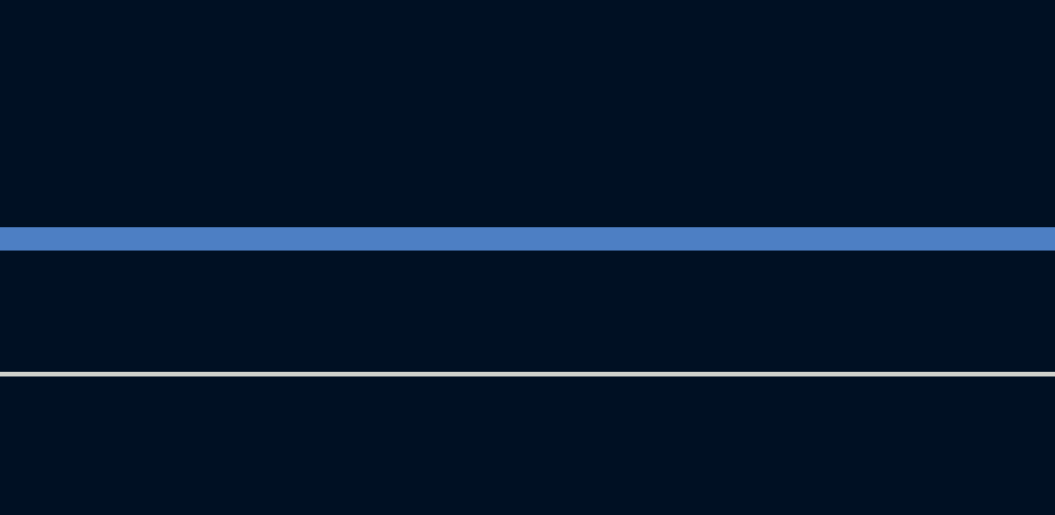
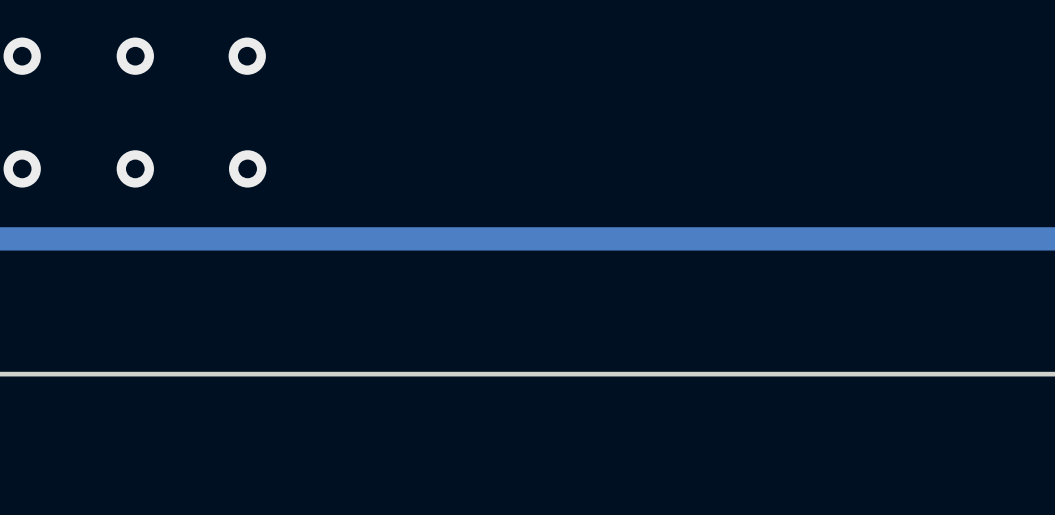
via: none -> (22, 56)
via: none -> (135, 56)
via: none -> (247, 56)
via: none -> (22, 168)
via: none -> (135, 168)
via: none -> (247, 168)

